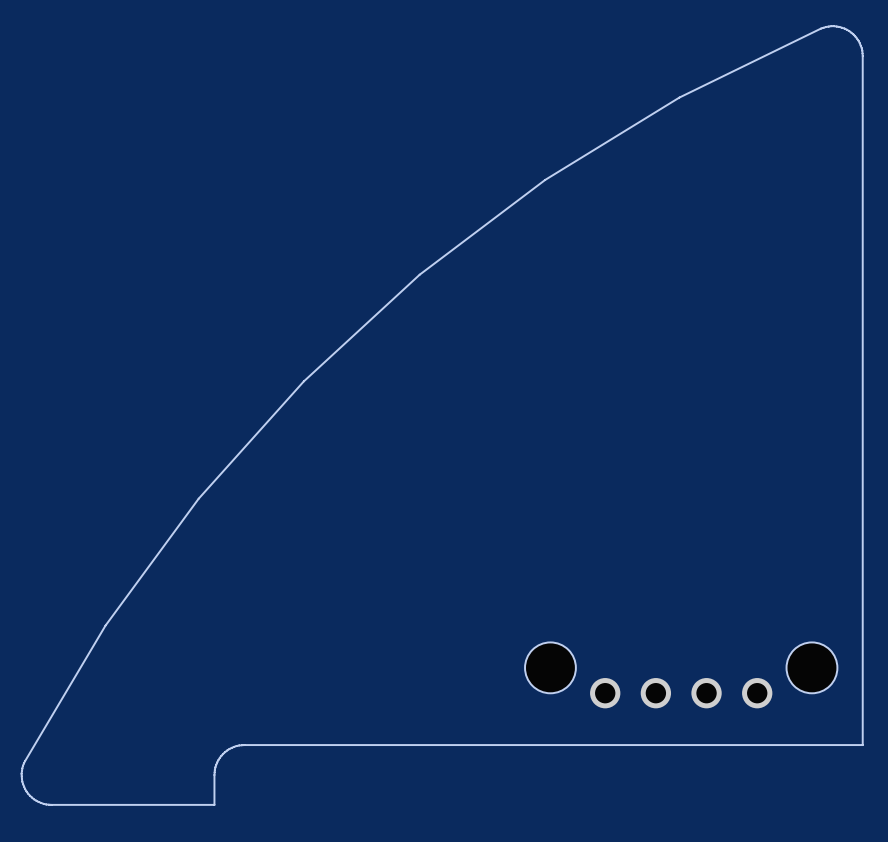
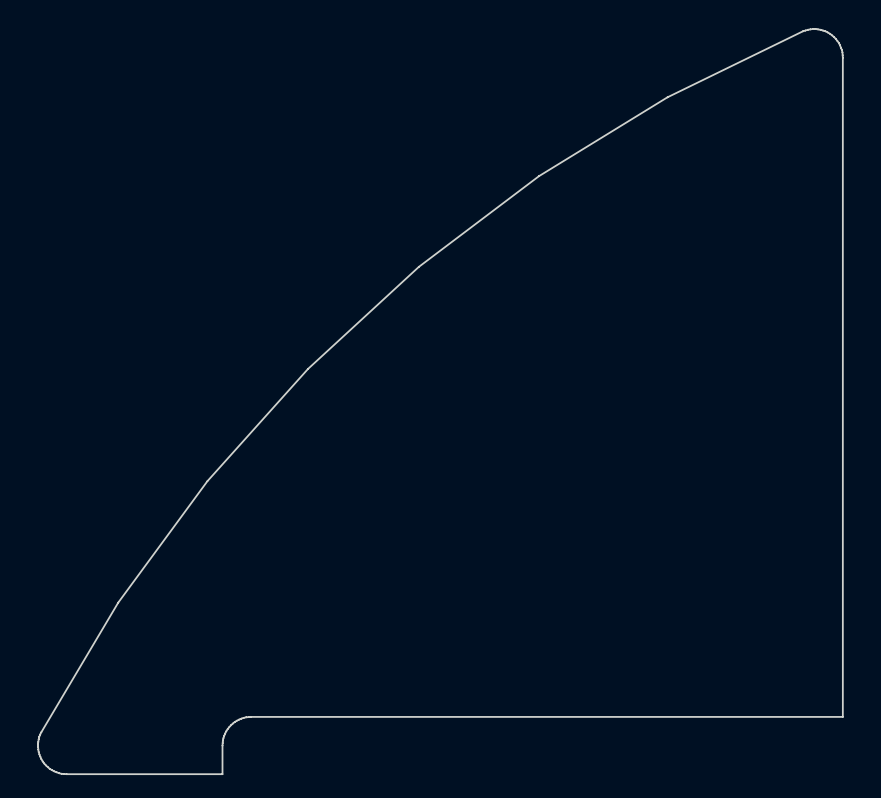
part: (681, 675) -> none

